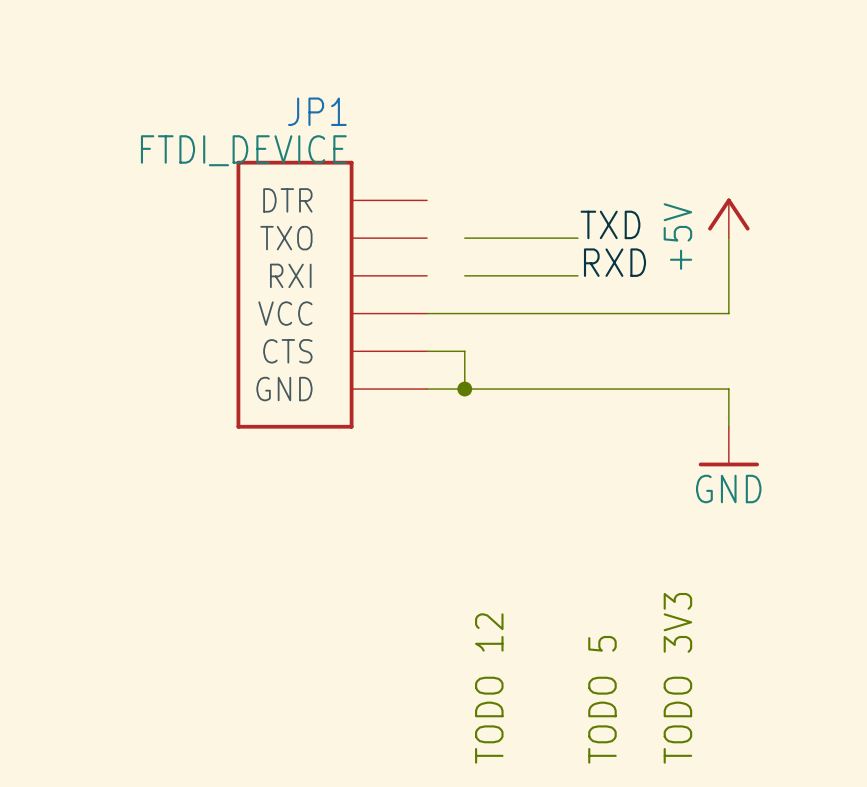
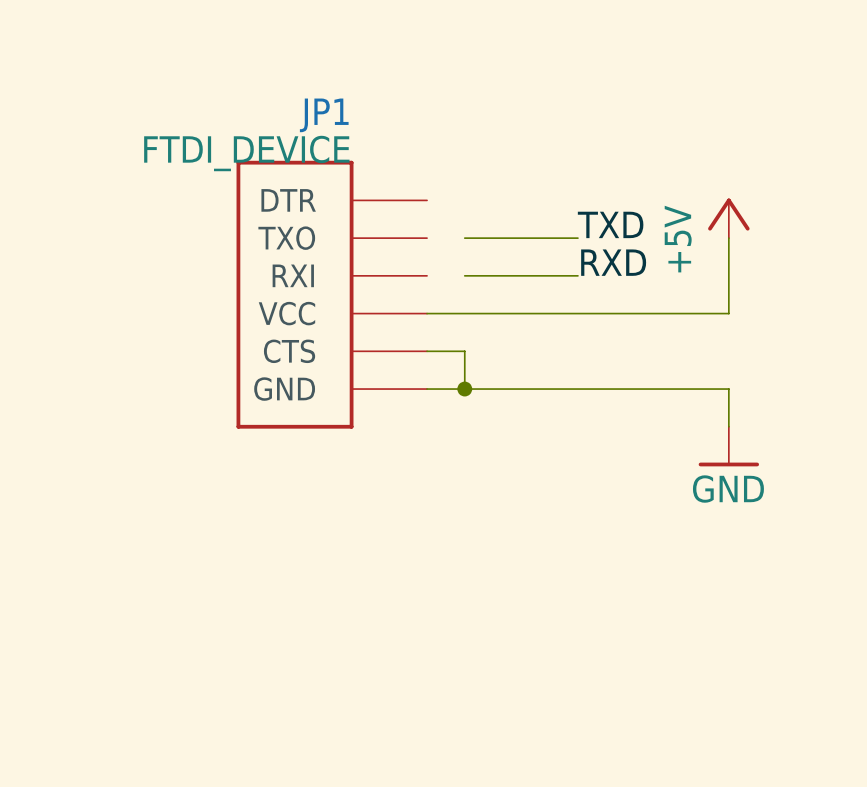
text: TODO 3V3 (677, 678) -> none
text: TODO 12 (489, 688) -> none
text: TODO 5 (602, 699) -> none

